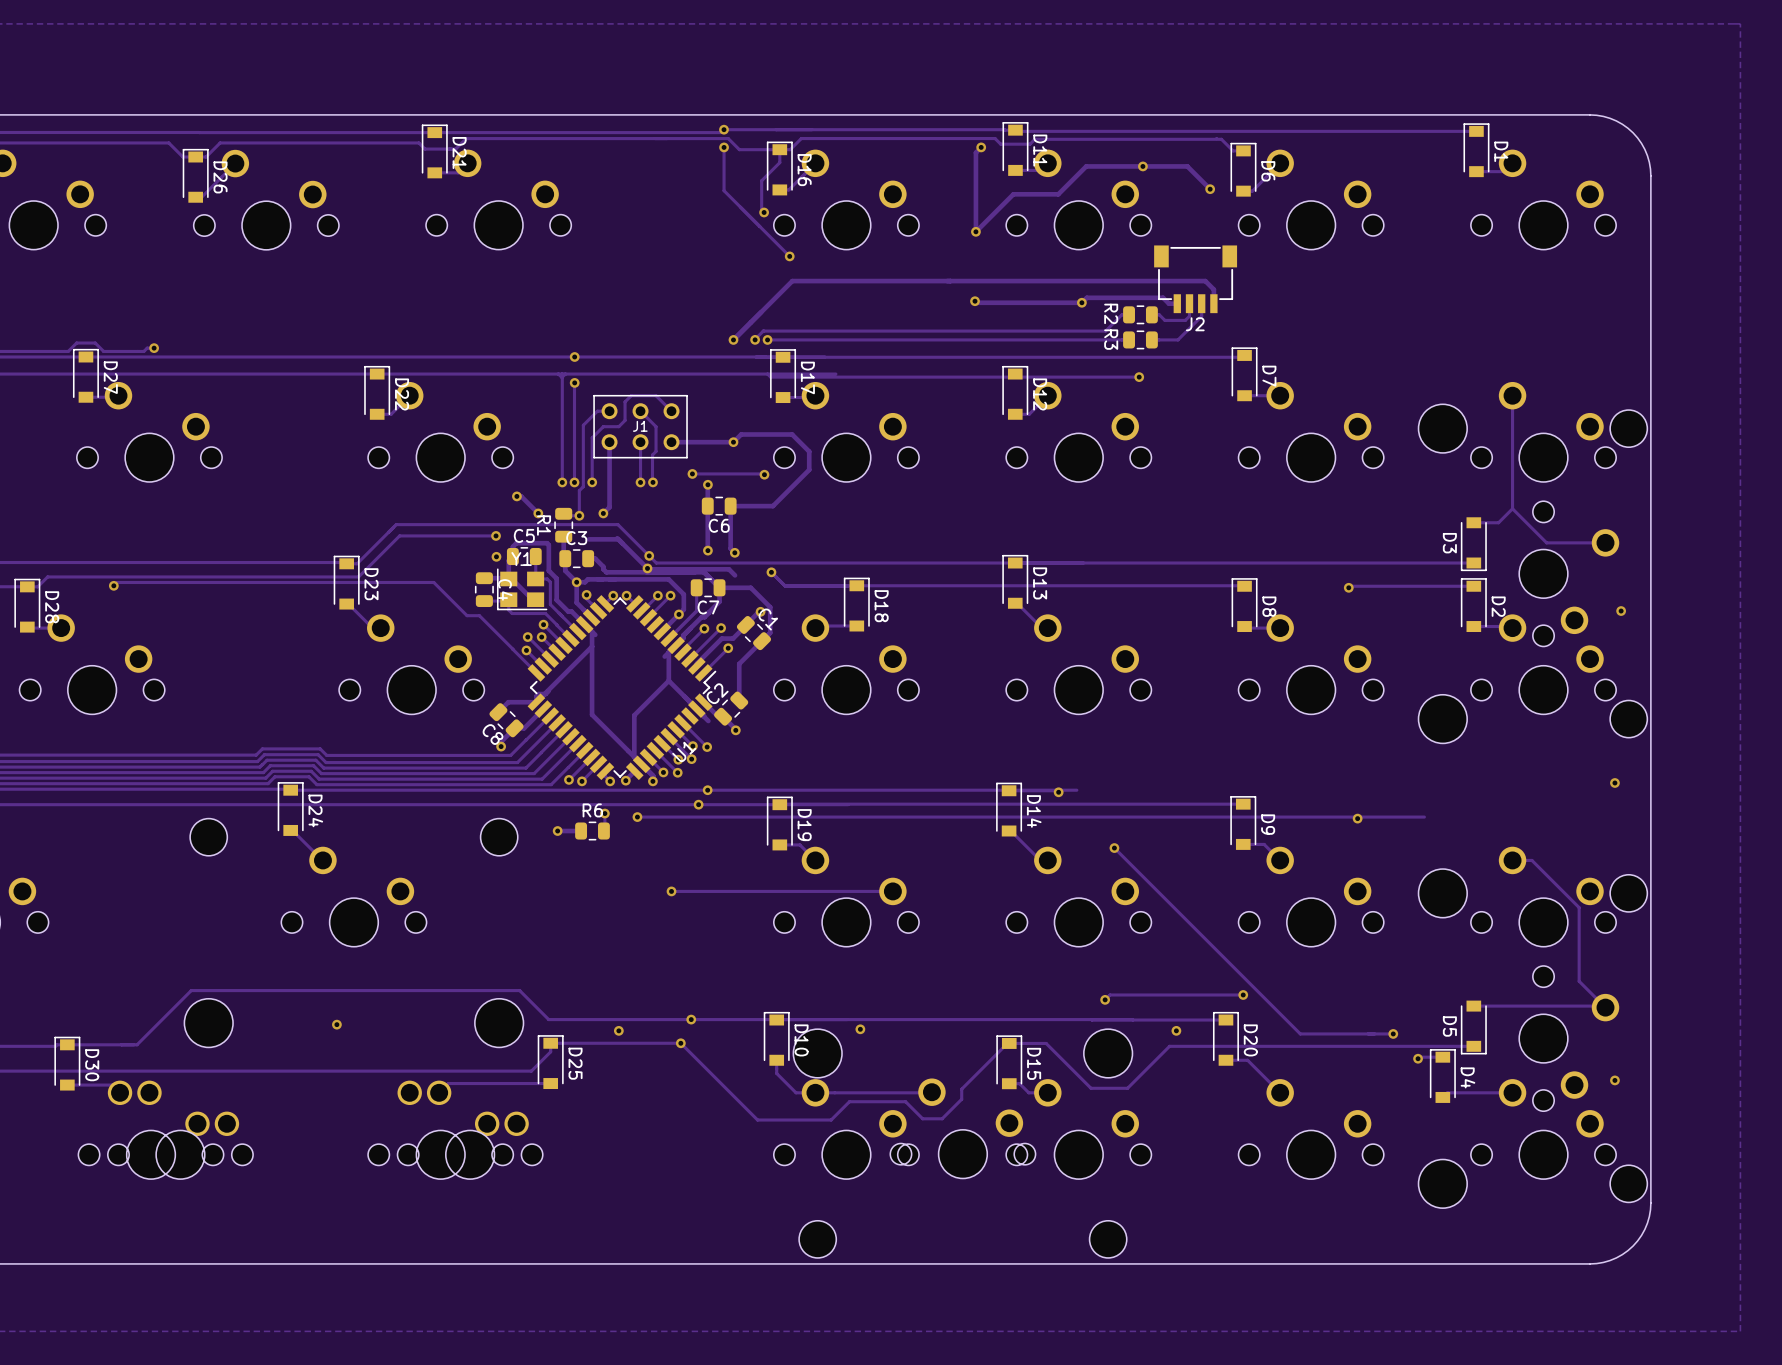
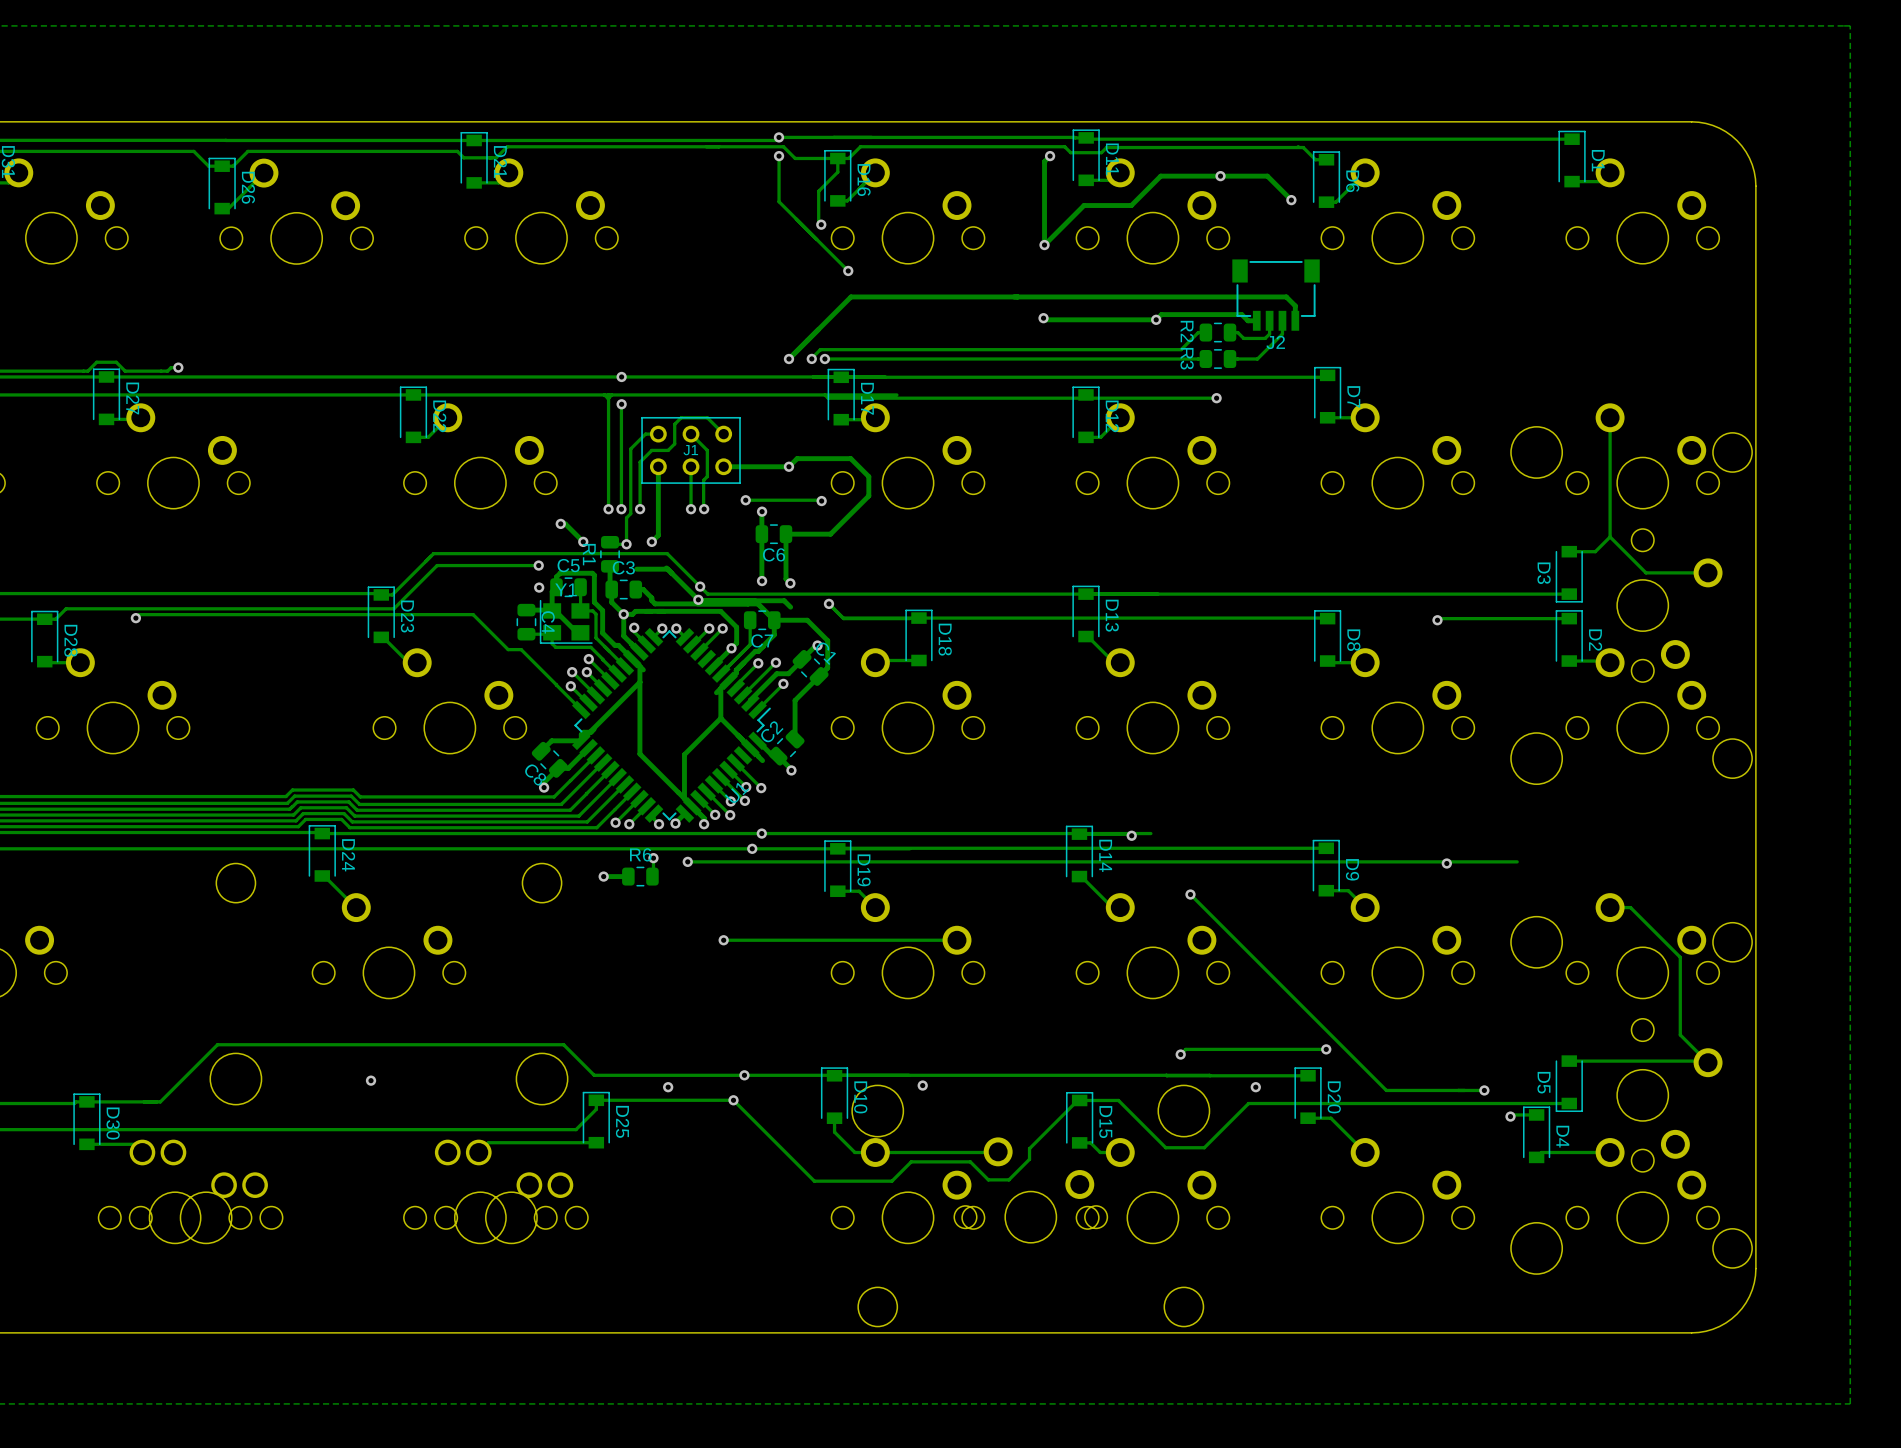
via: (1621, 611) -> none
via: (1614, 782) -> none
via: (1614, 1080) -> none

